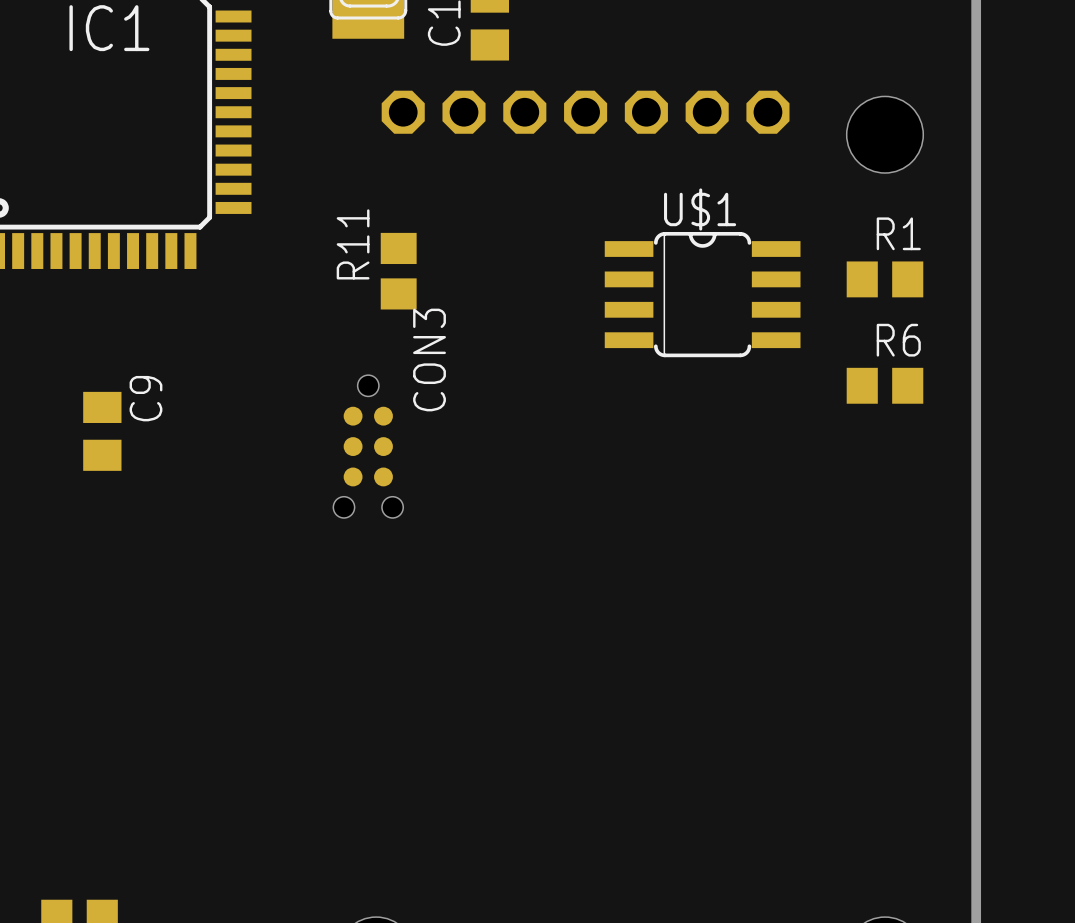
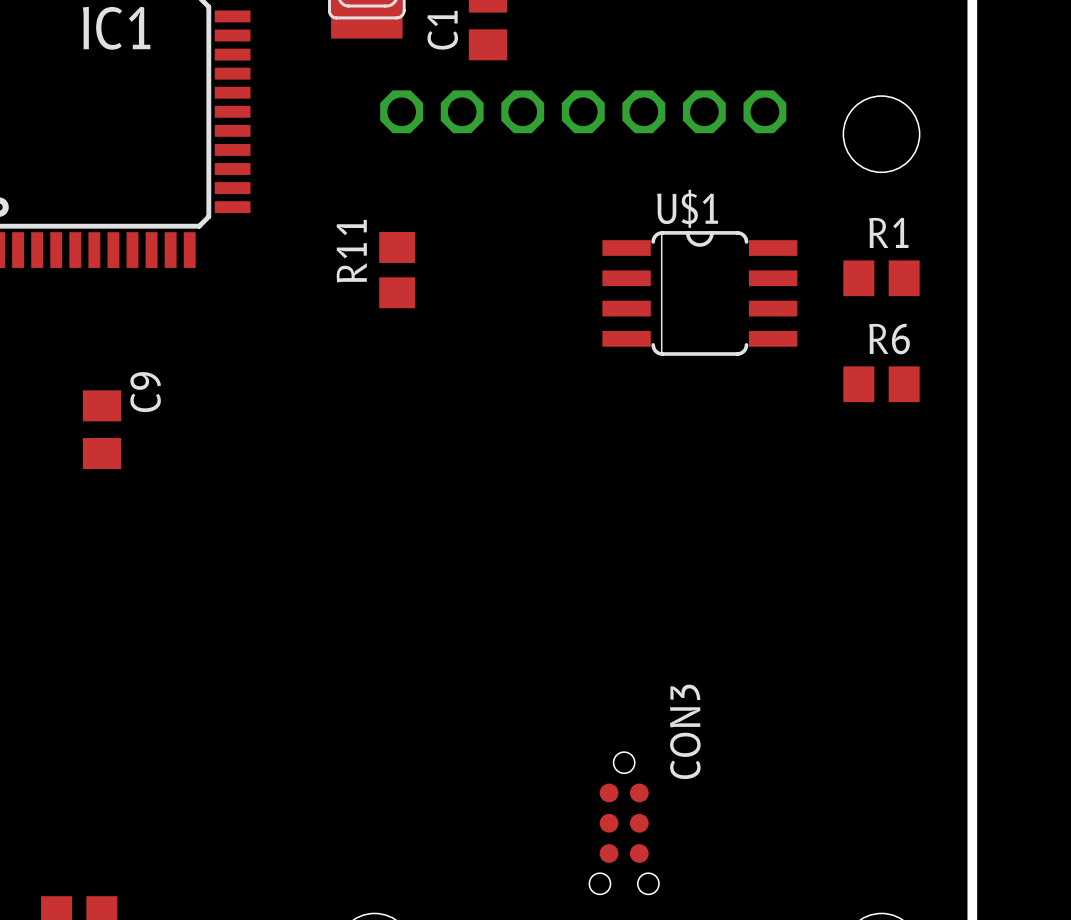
CON3 position: (368, 446) -> (624, 823)

